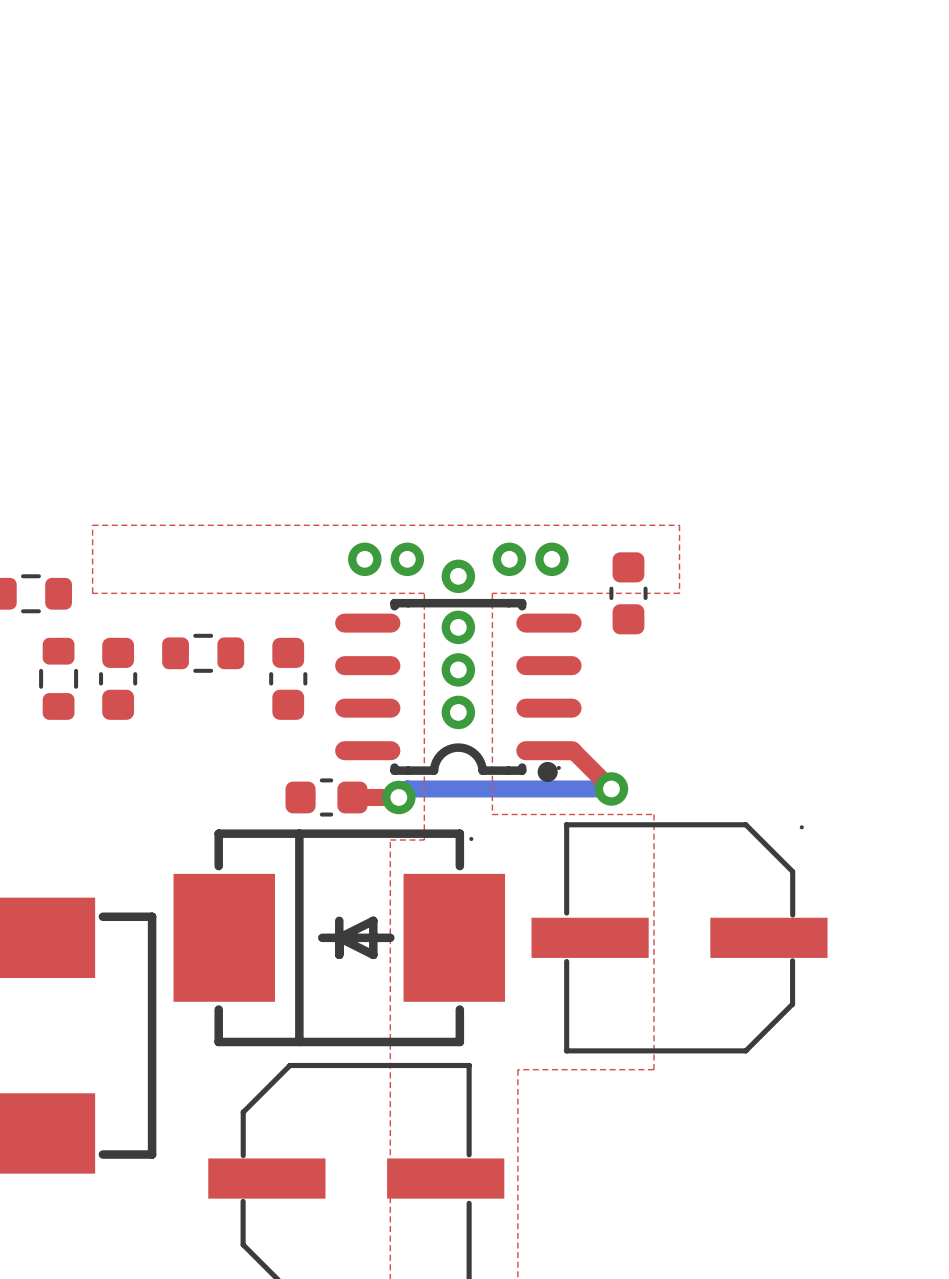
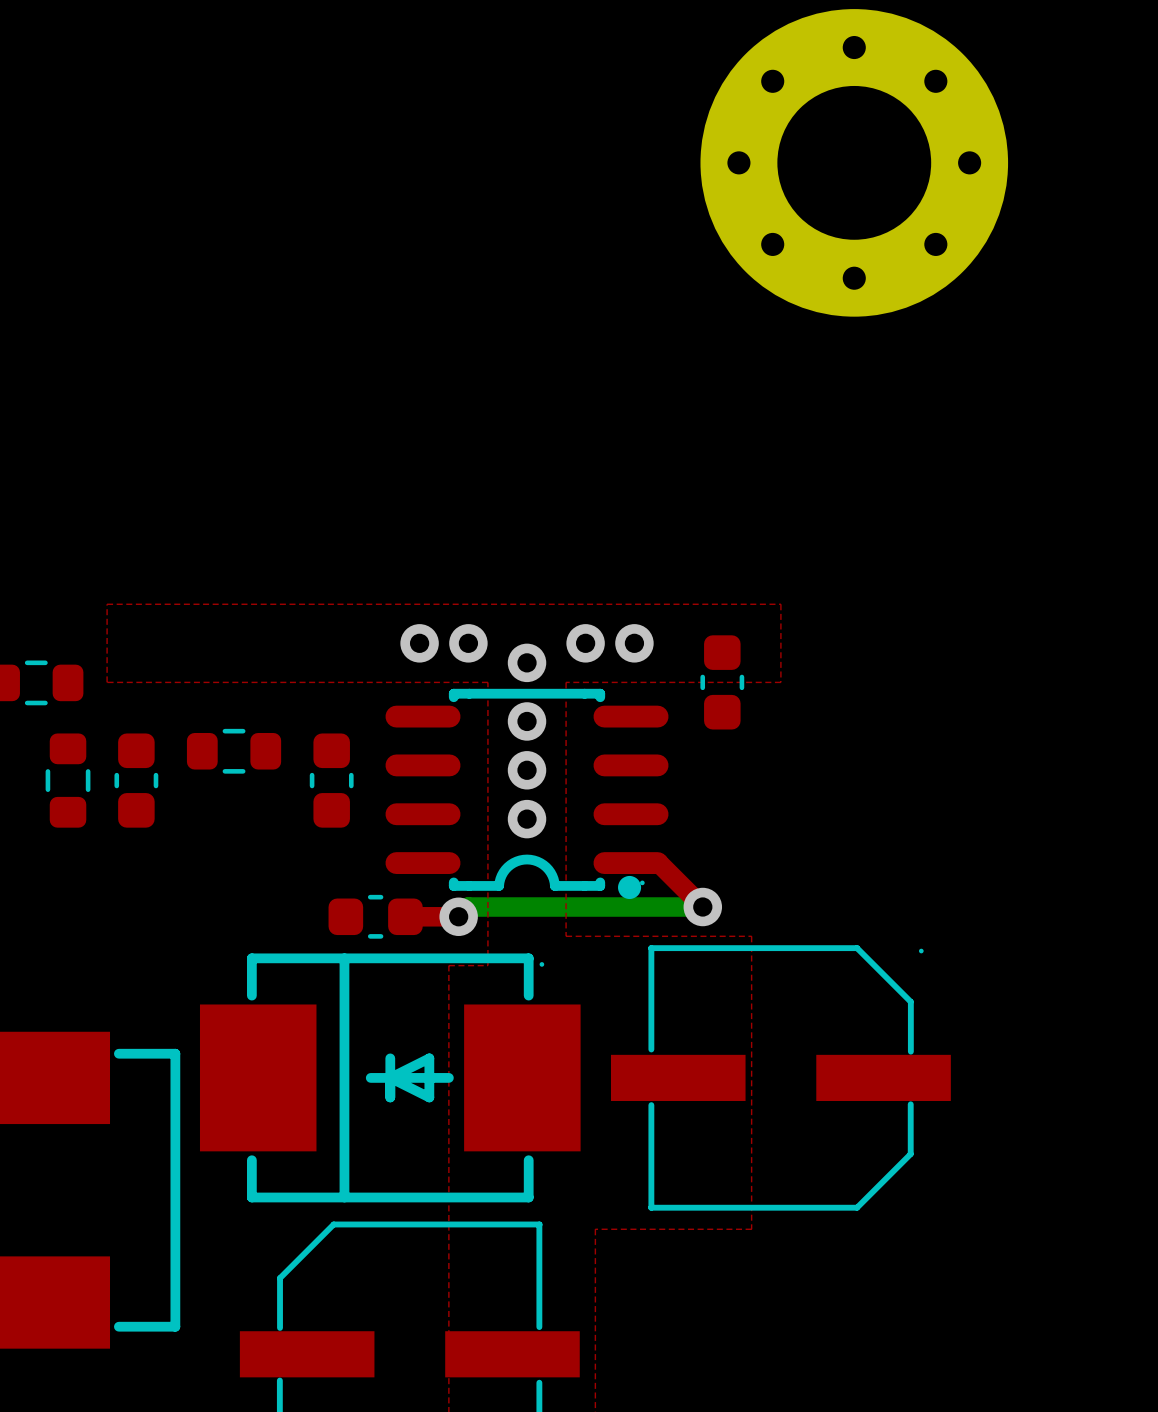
part: none -> (854, 162)

